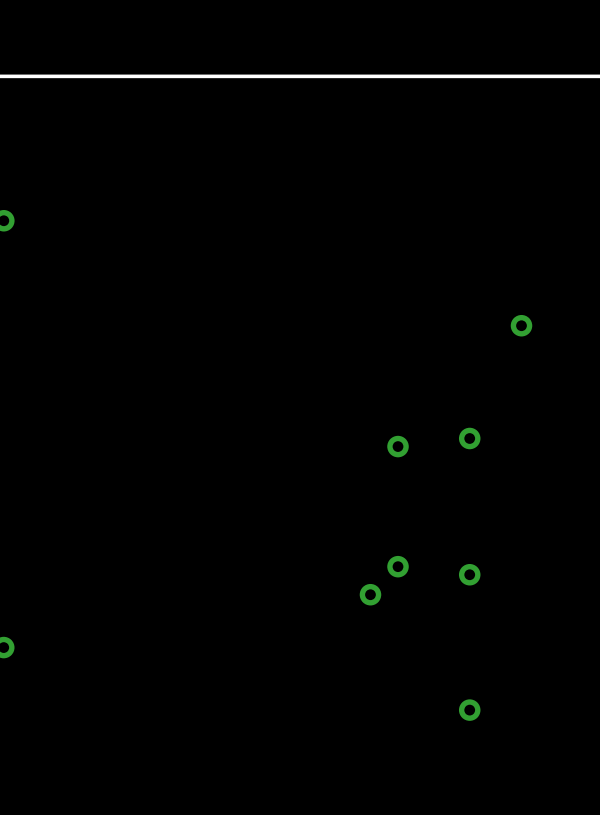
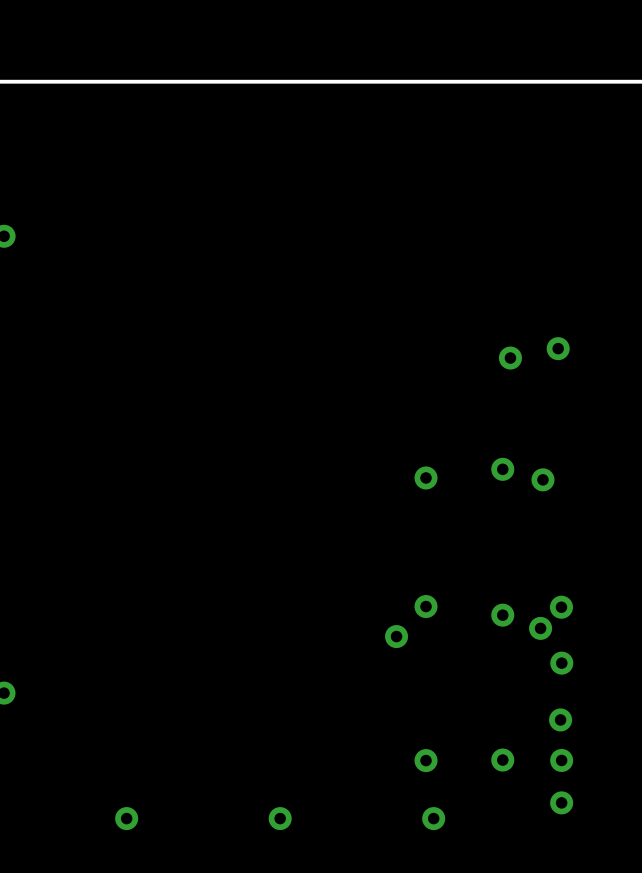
via: none -> (510, 358)
via: none -> (542, 479)
via: none -> (561, 607)
via: none -> (540, 628)
via: none -> (561, 663)
via: none -> (560, 719)
via: none -> (426, 760)
via: none -> (561, 760)
via: none -> (561, 802)
via: none -> (126, 818)
via: none -> (280, 818)
via: none -> (433, 818)

